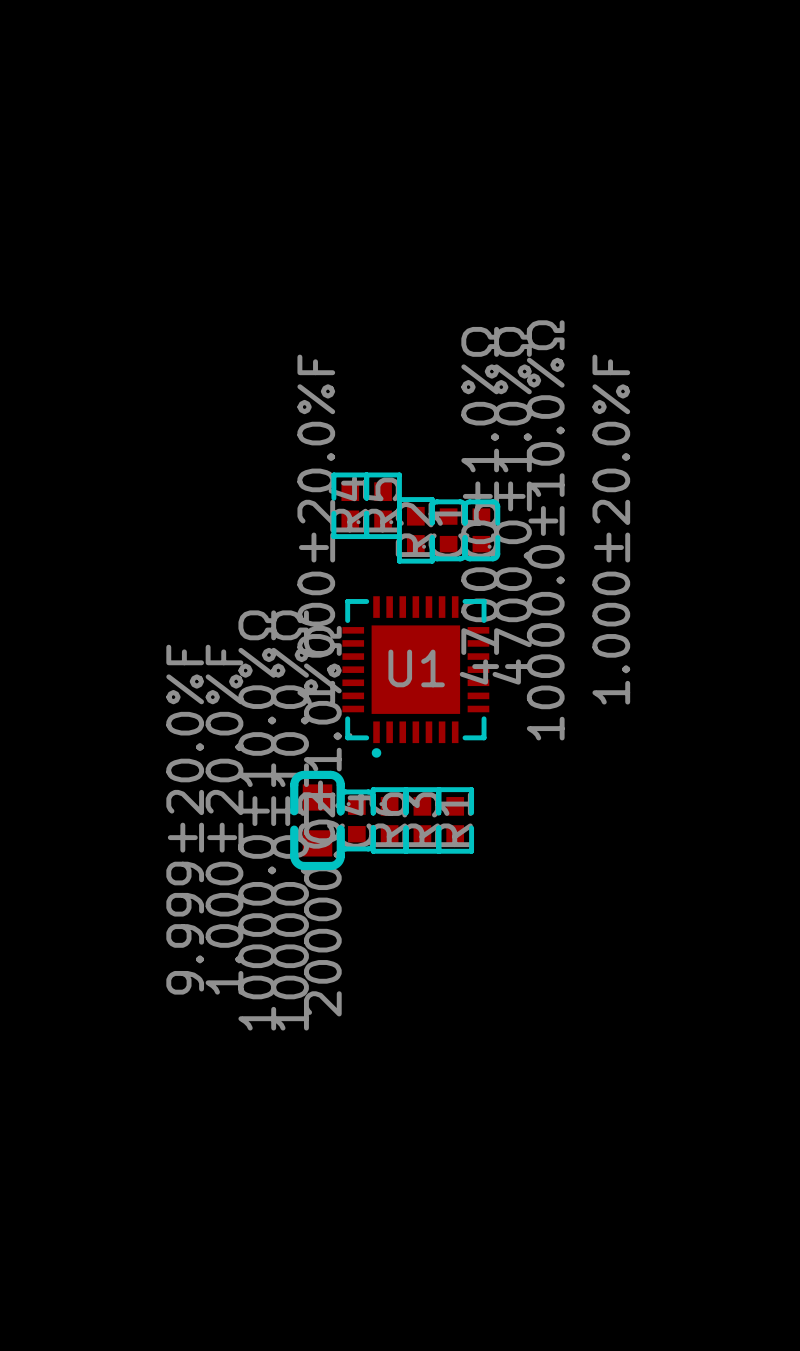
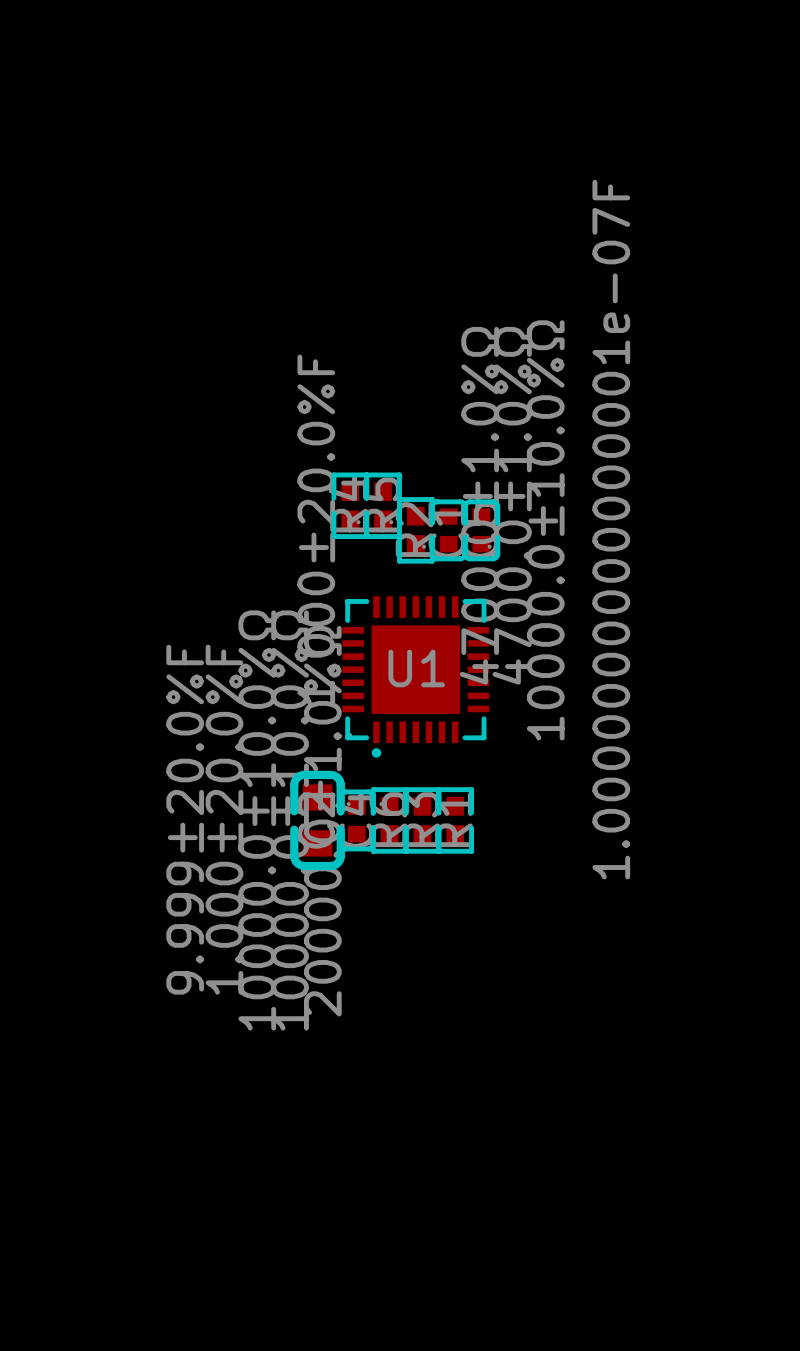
part value: 1.000±20.0%F (611, 529) -> 1.0000000000000001e-07F (611, 529)

